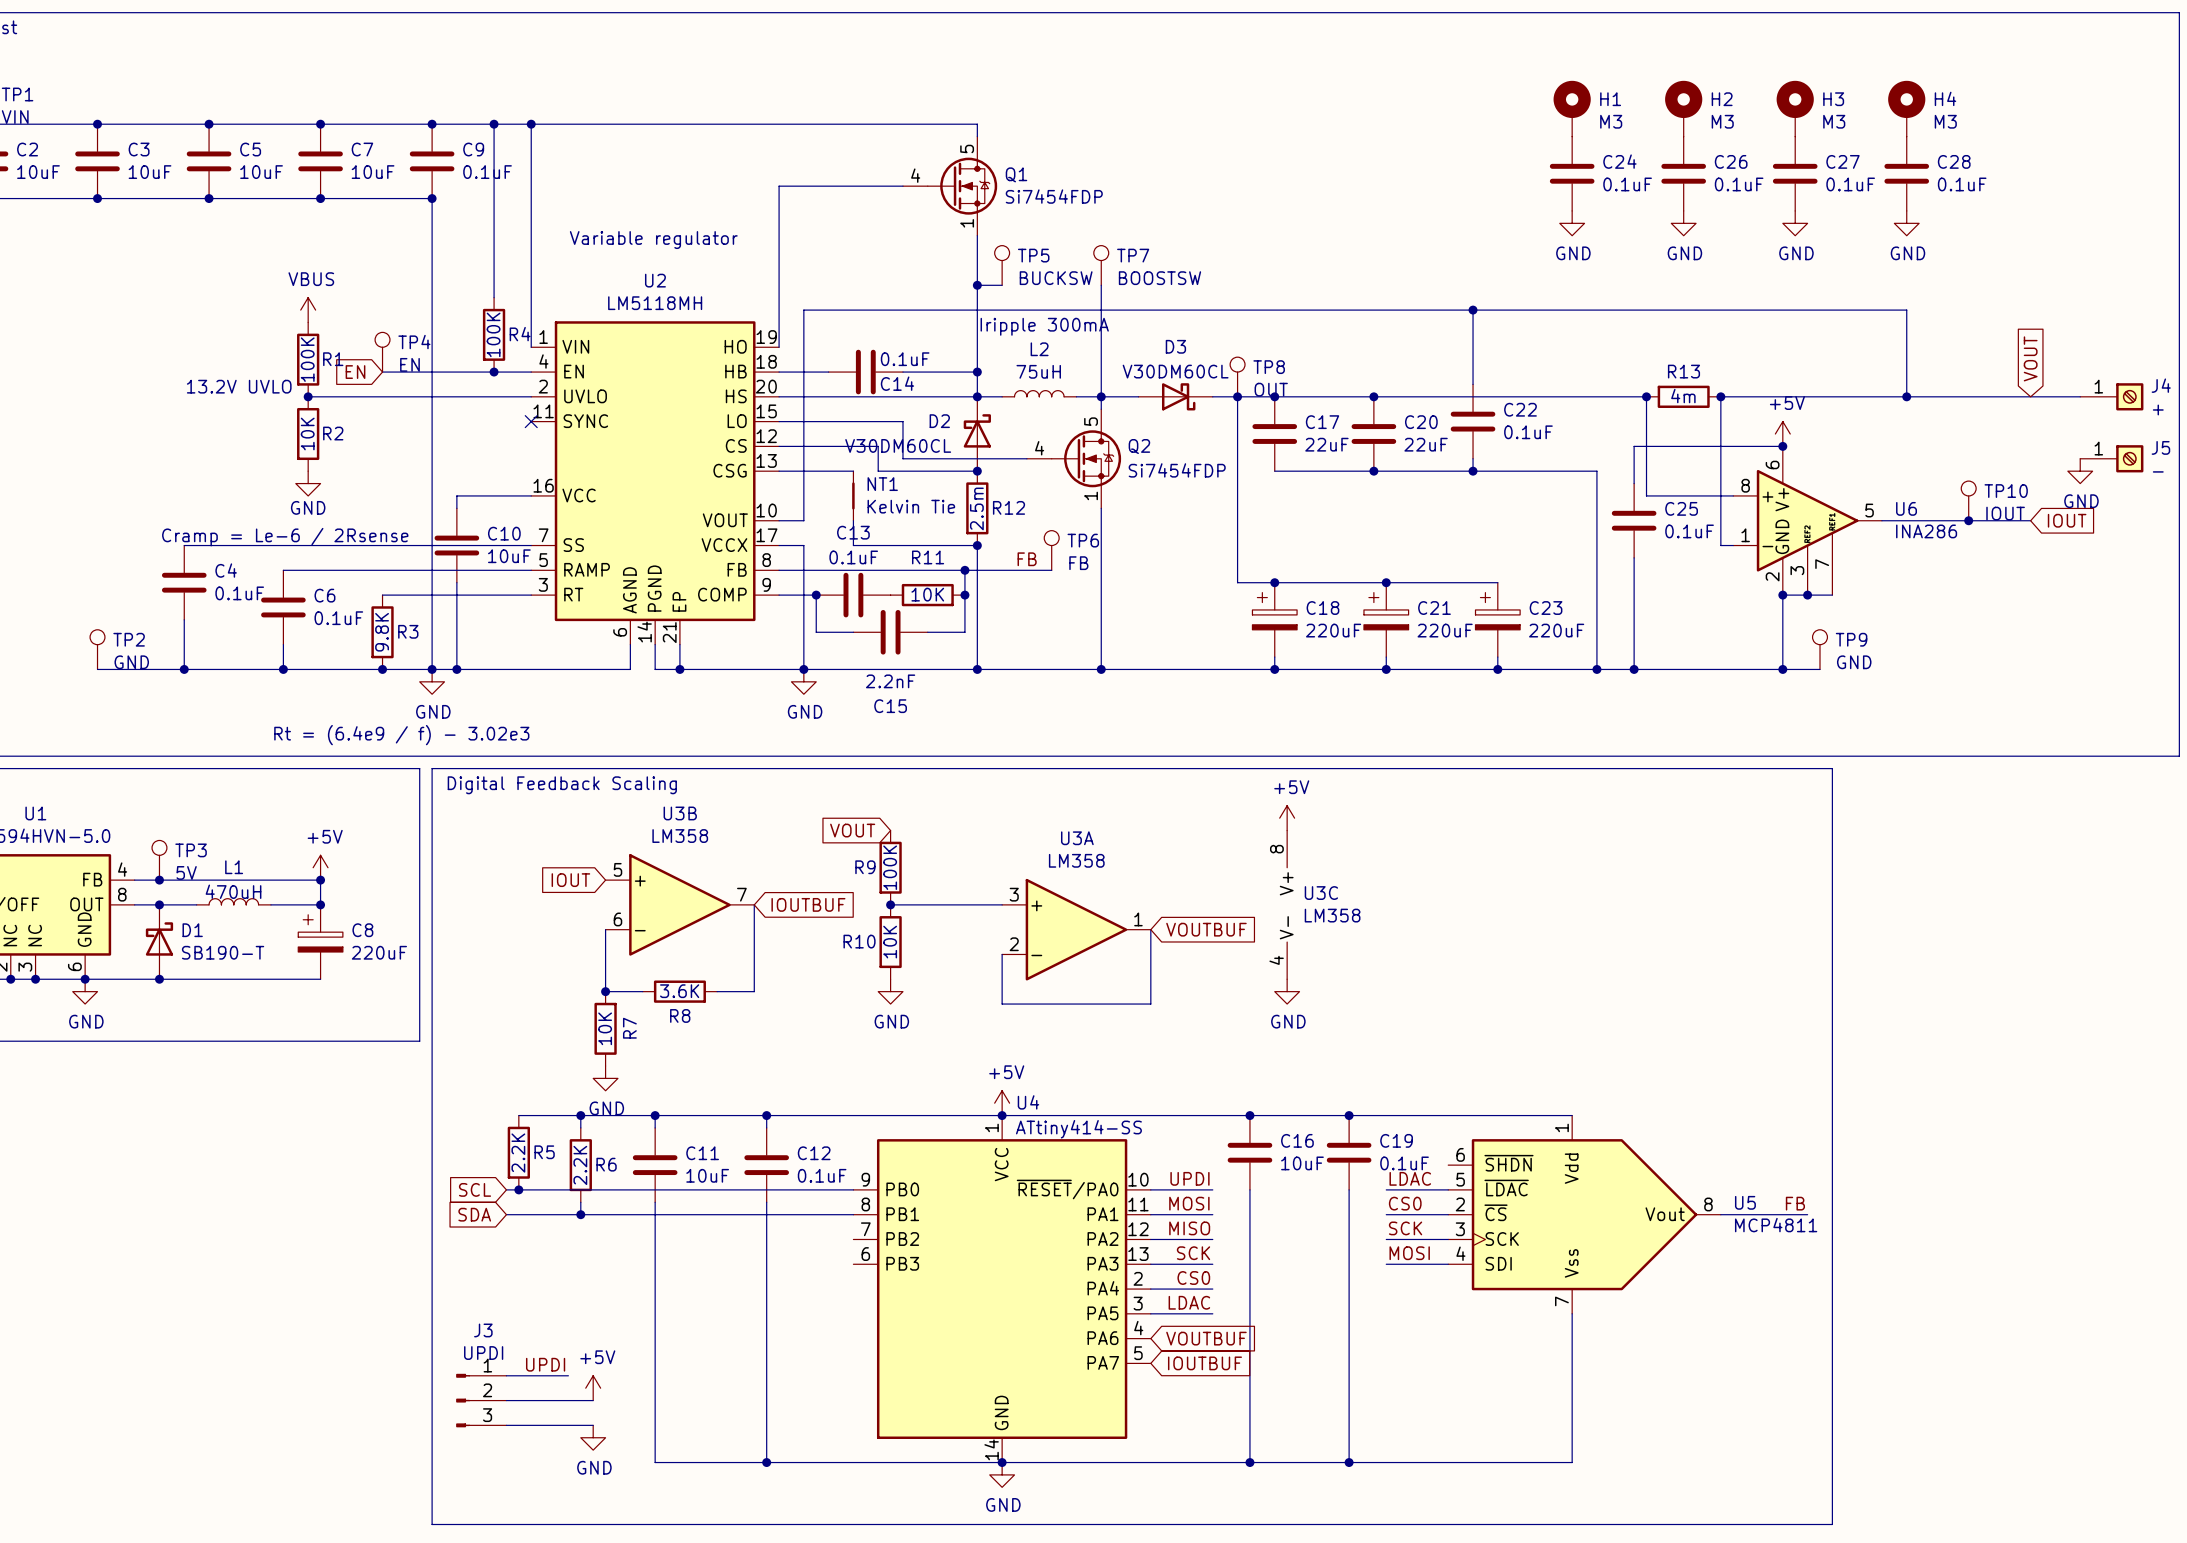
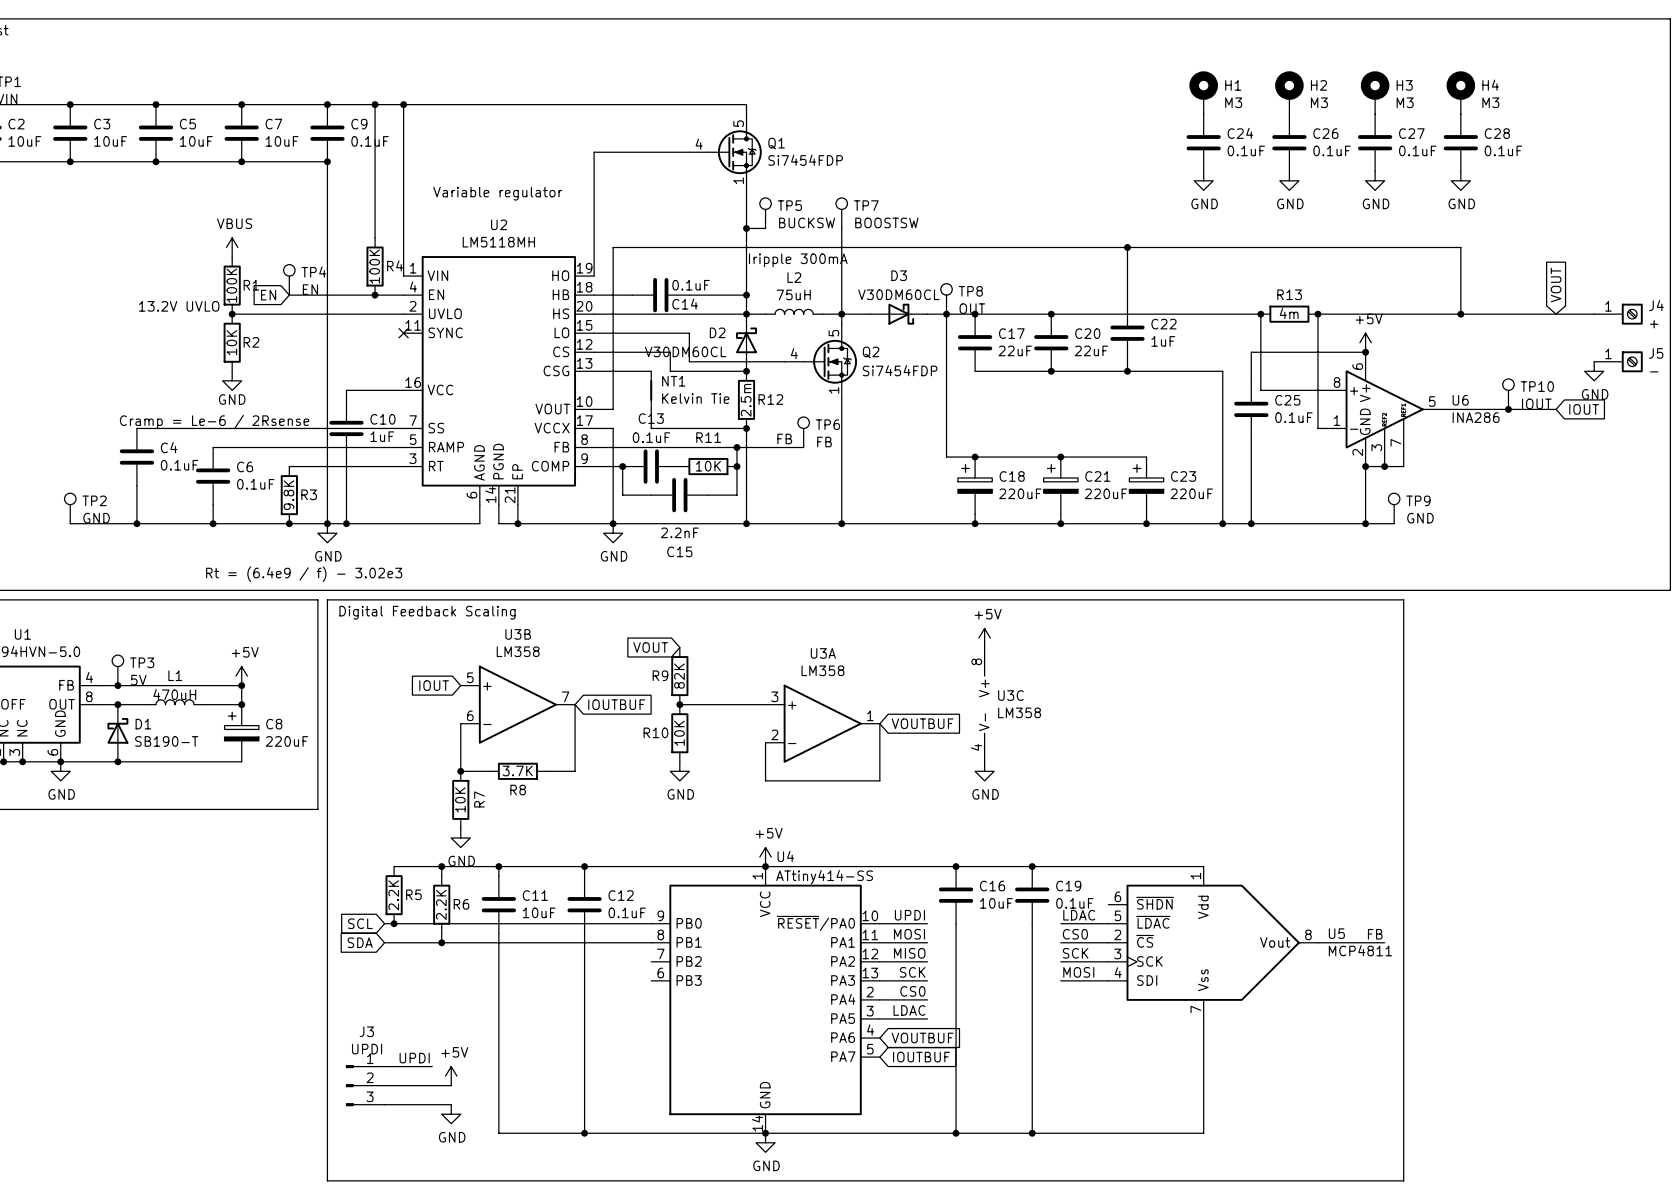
C22 value: 0.1uF (1528, 432) -> 1uF (1163, 341)
C10 value: 10uF (509, 556) -> 1uF (382, 436)
R9 value: 100K (890, 867) -> 82K (679, 676)
R8 value: 3.6K (679, 991) -> 3.7K (517, 770)

